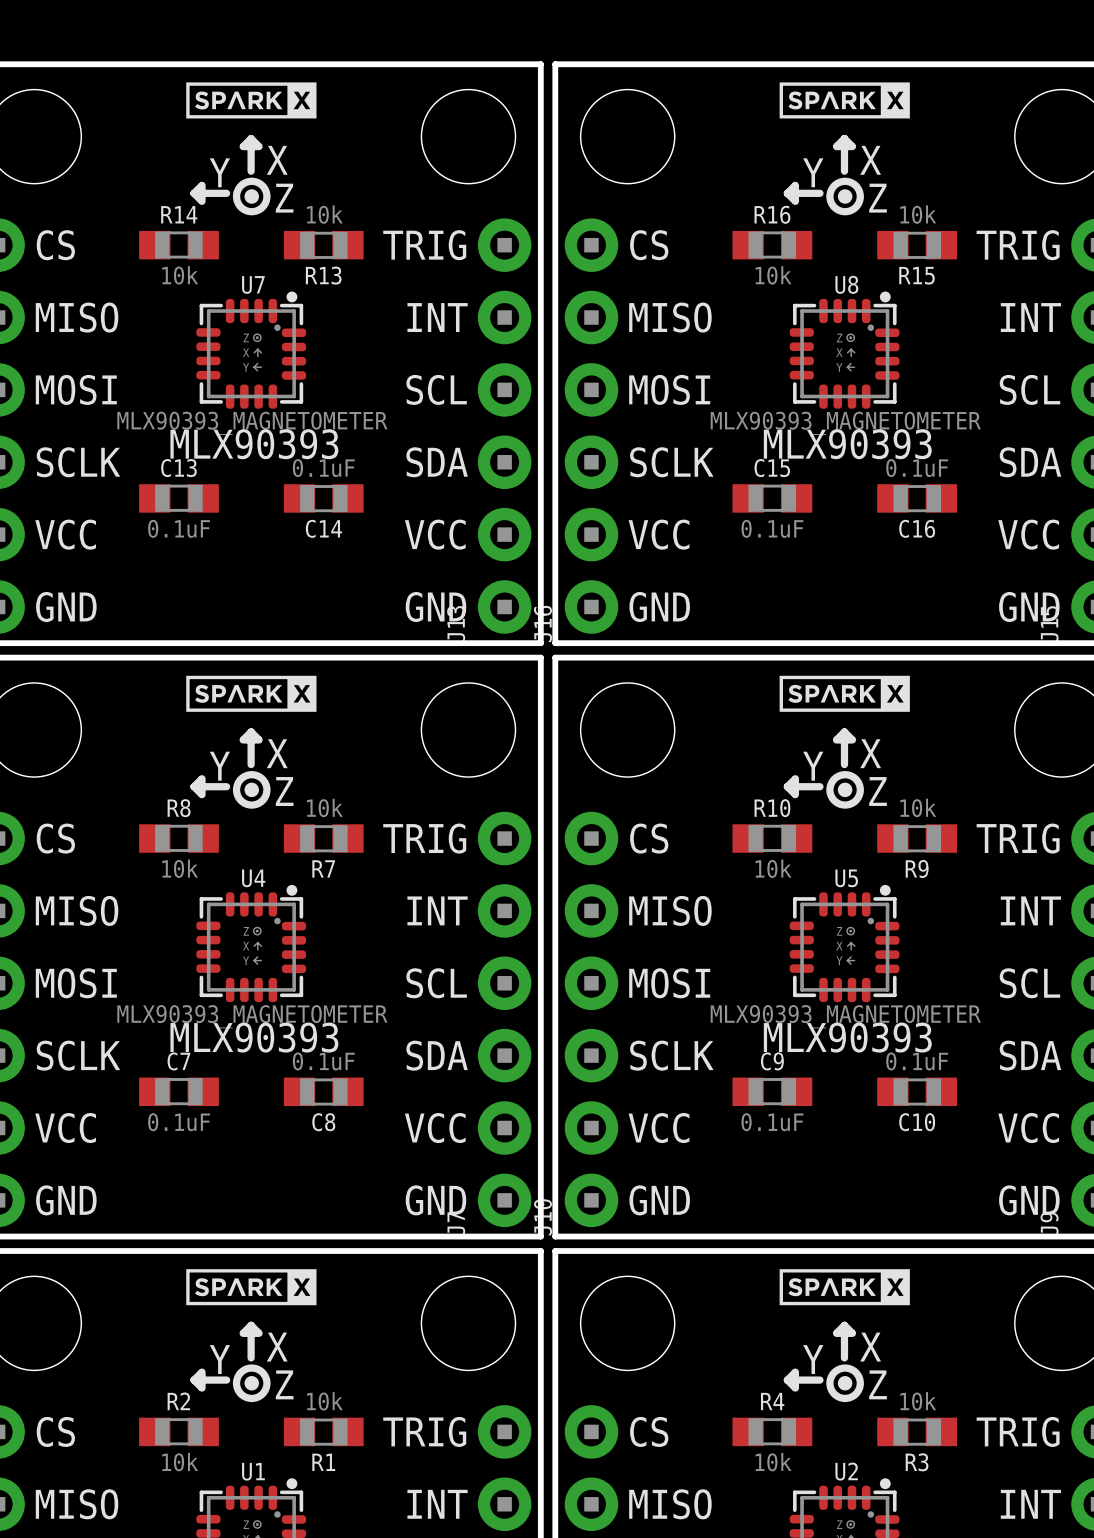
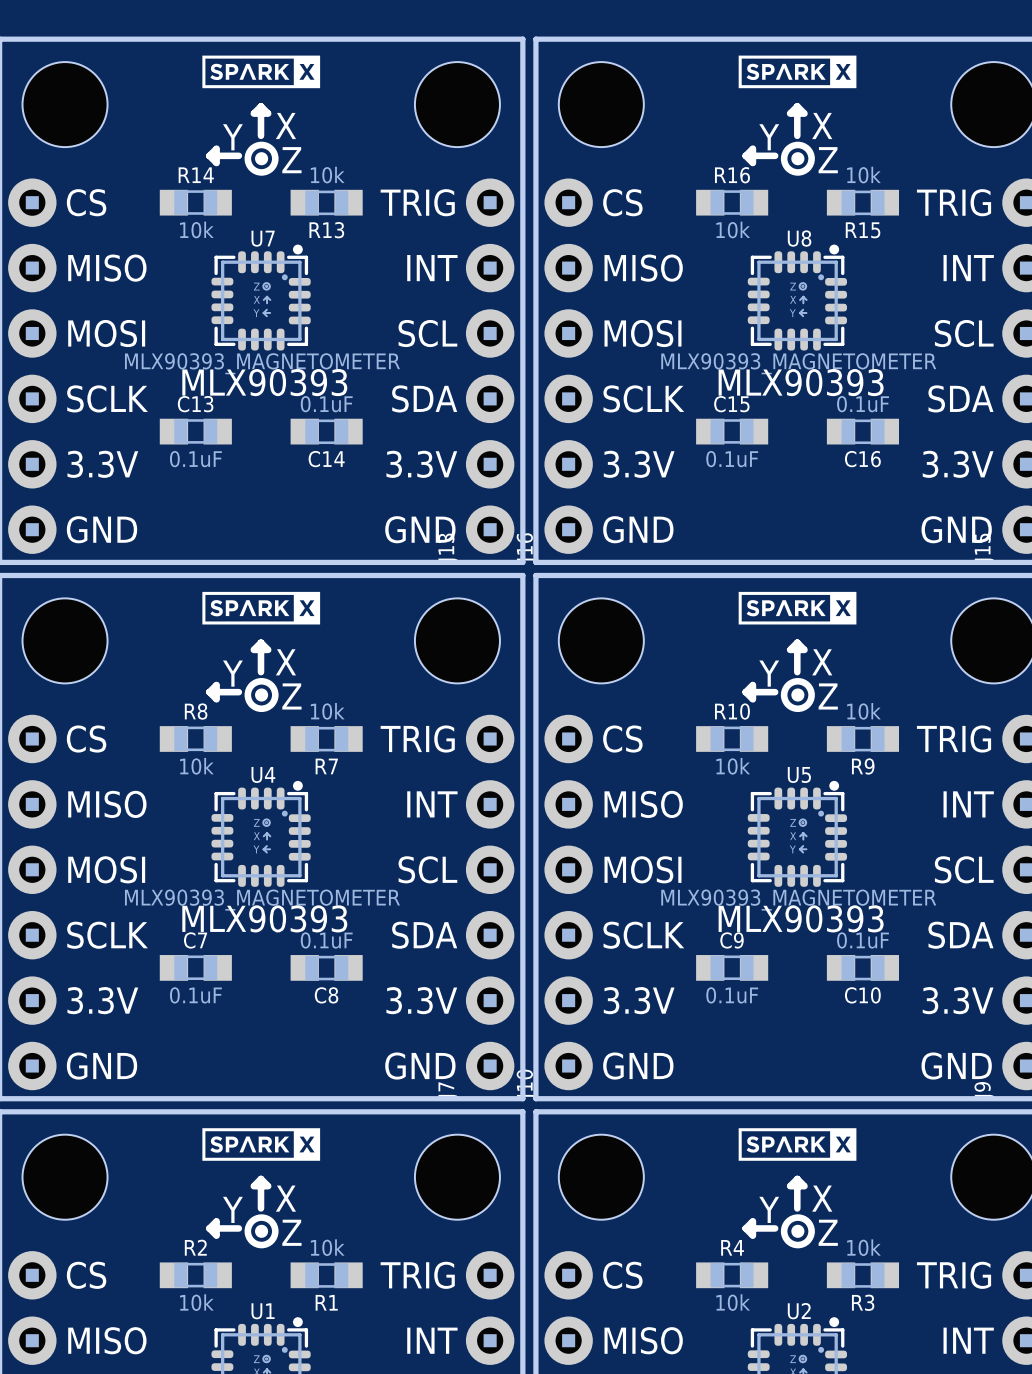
text: VCC (65, 534) -> 3.3V (102, 464)
text: VCC (435, 534) -> 3.3V (421, 464)
text: VCC (659, 534) -> 3.3V (639, 464)
text: VCC (1028, 534) -> 3.3V (958, 464)
text: VCC (65, 1128) -> 3.3V (102, 1000)
text: VCC (435, 1128) -> 3.3V (421, 1000)
text: VCC (659, 1128) -> 3.3V (639, 1000)
text: VCC (1028, 1128) -> 3.3V (958, 1000)

